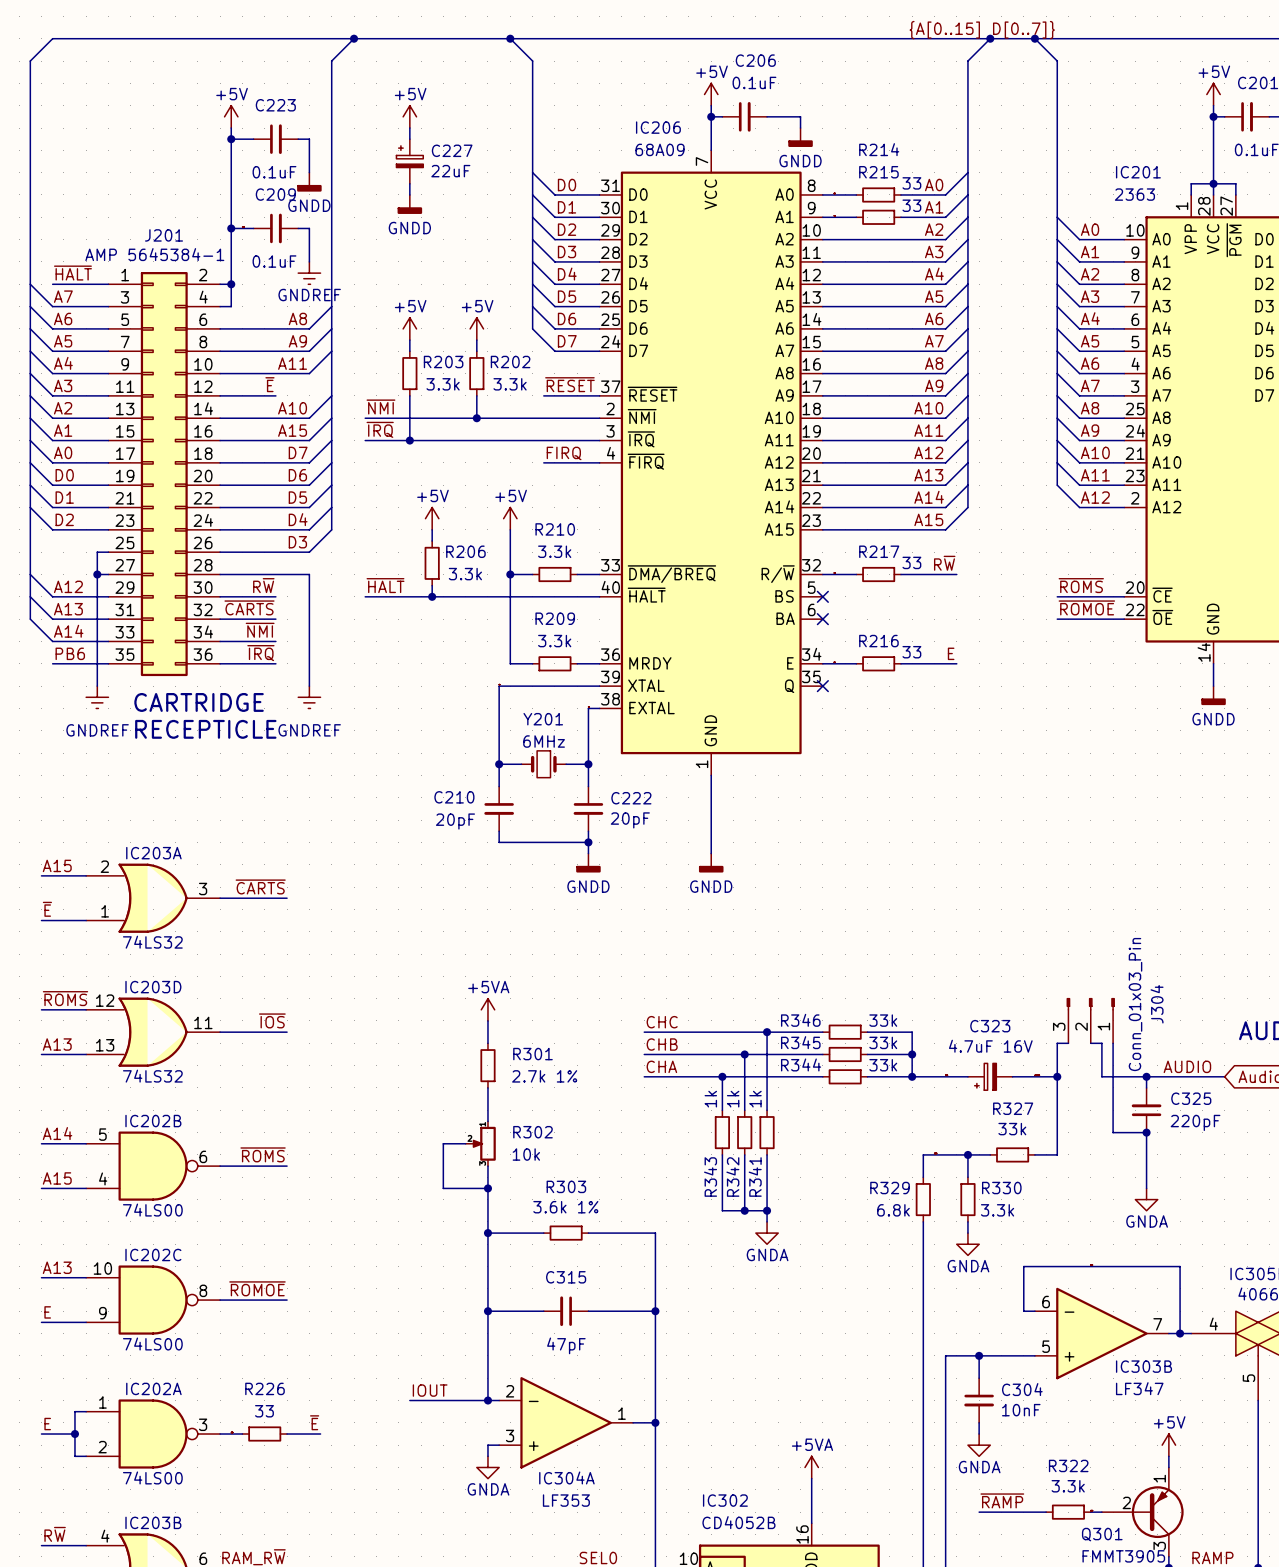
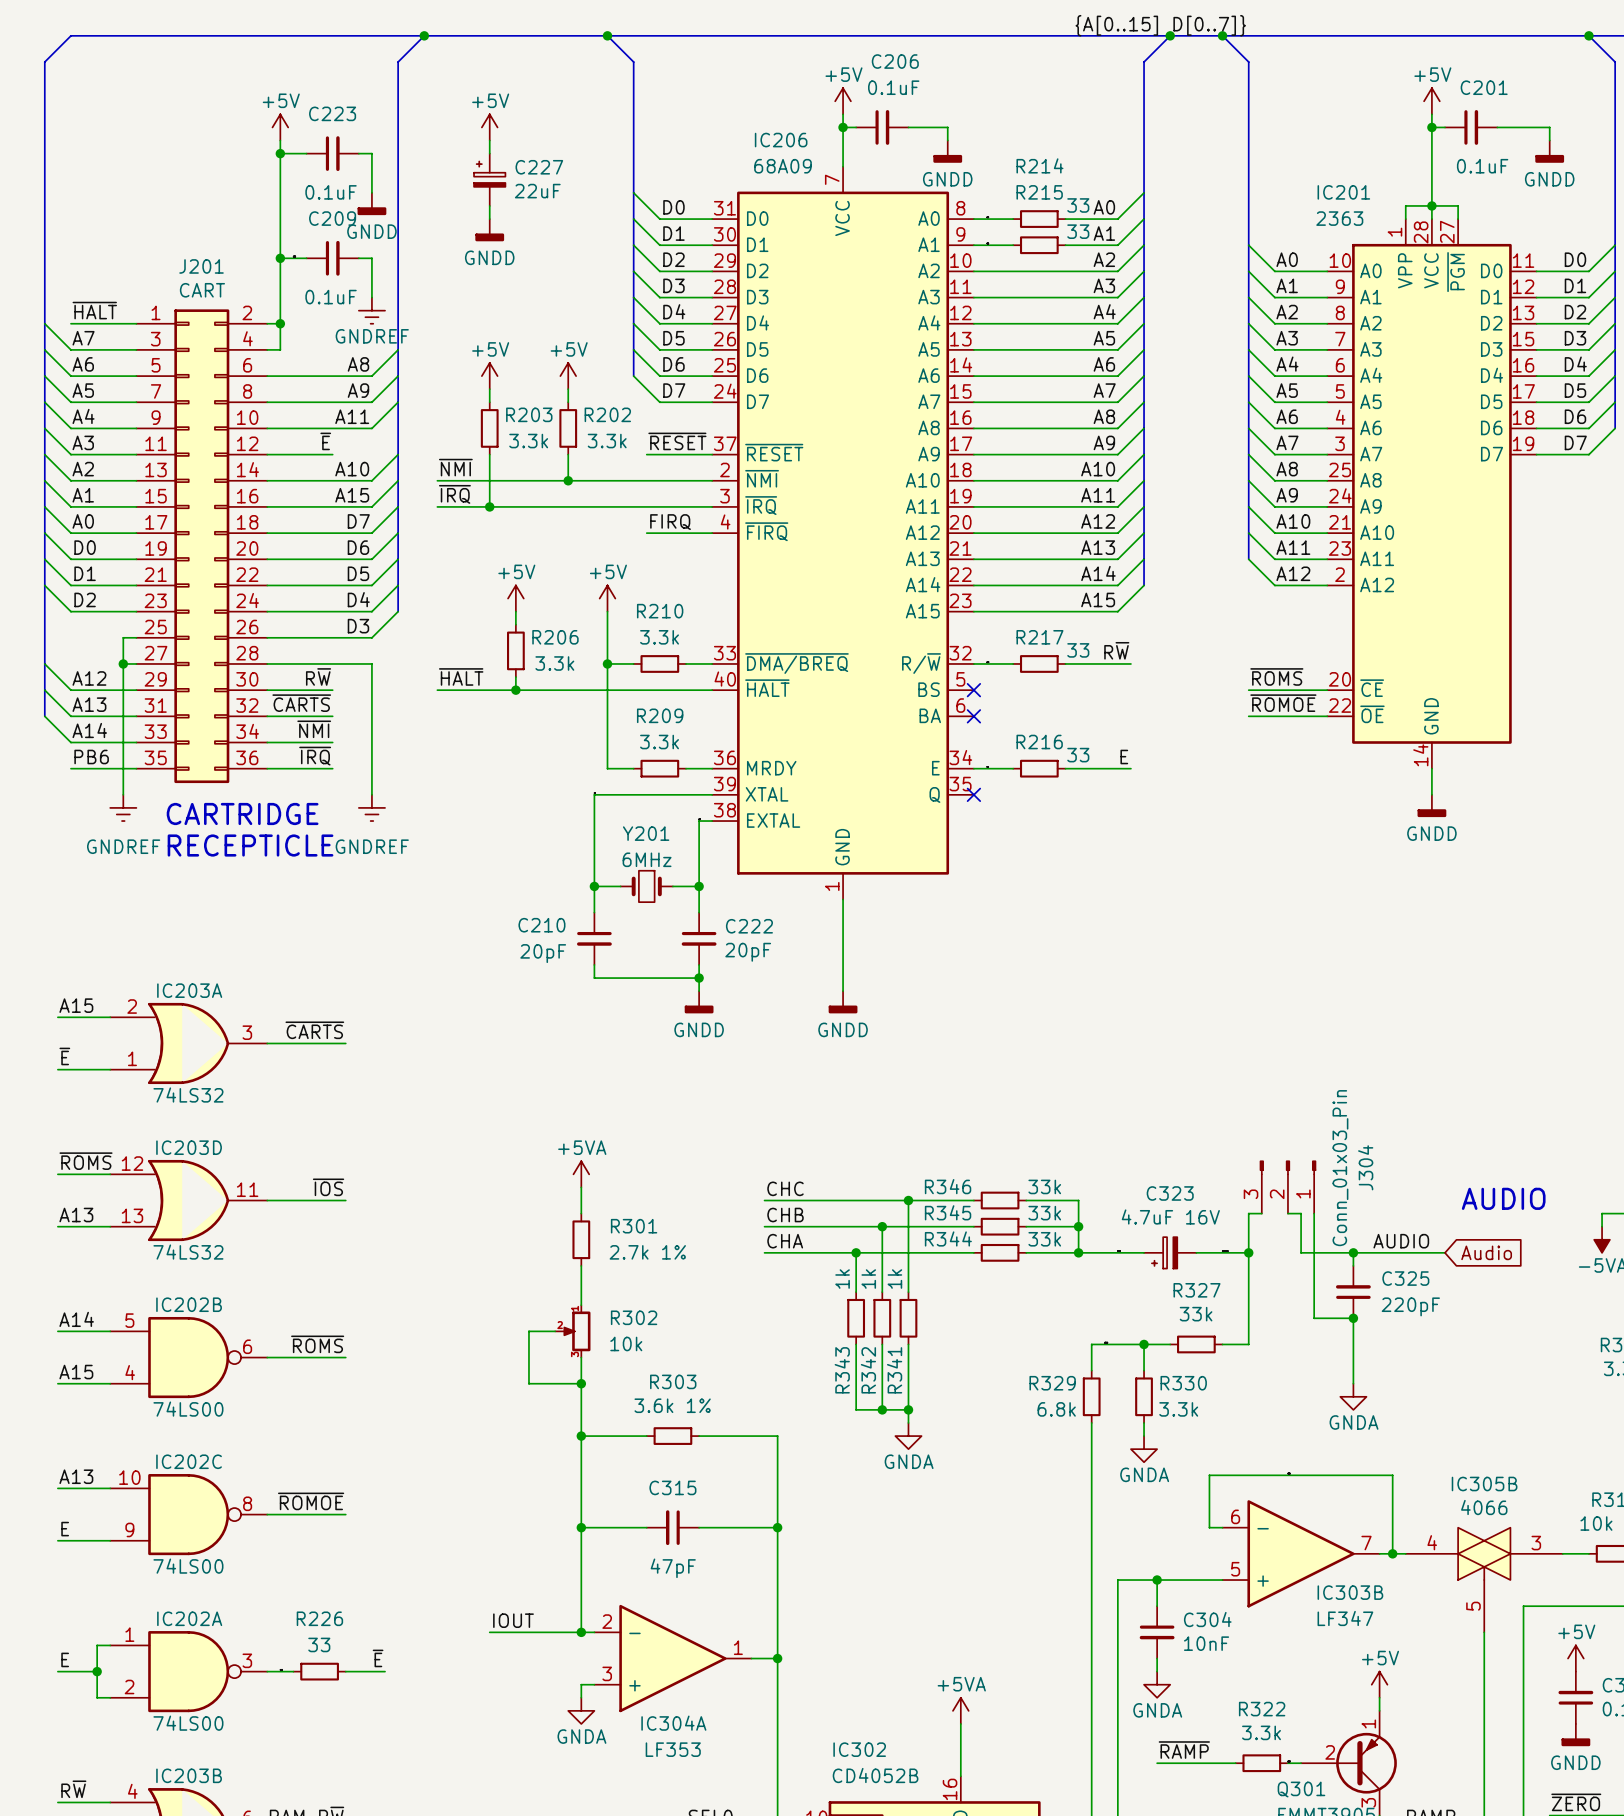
J201 value: AMP 5645384-1 (154, 254) -> CART (202, 290)

